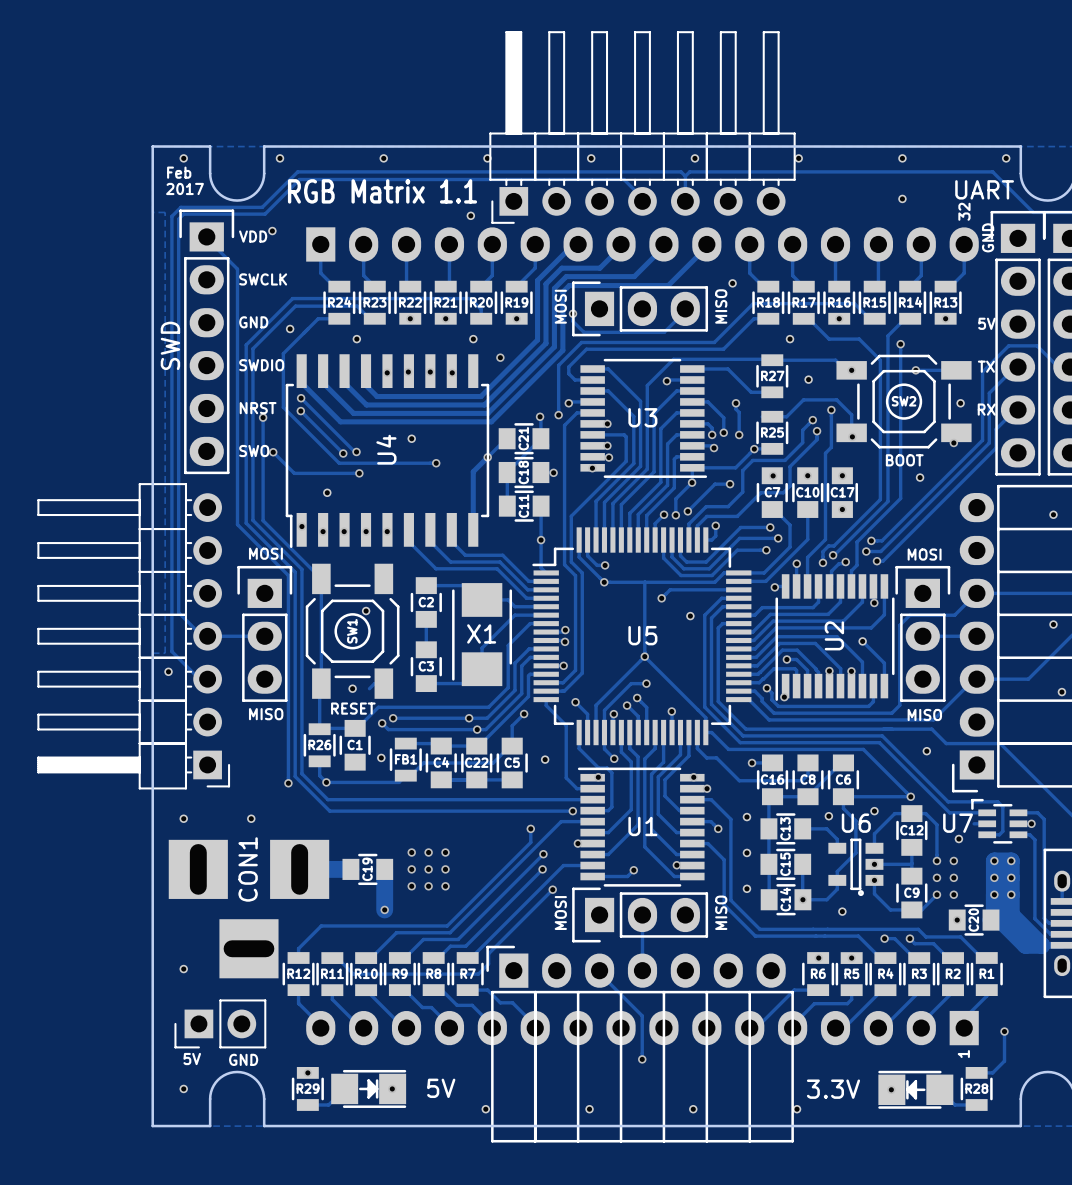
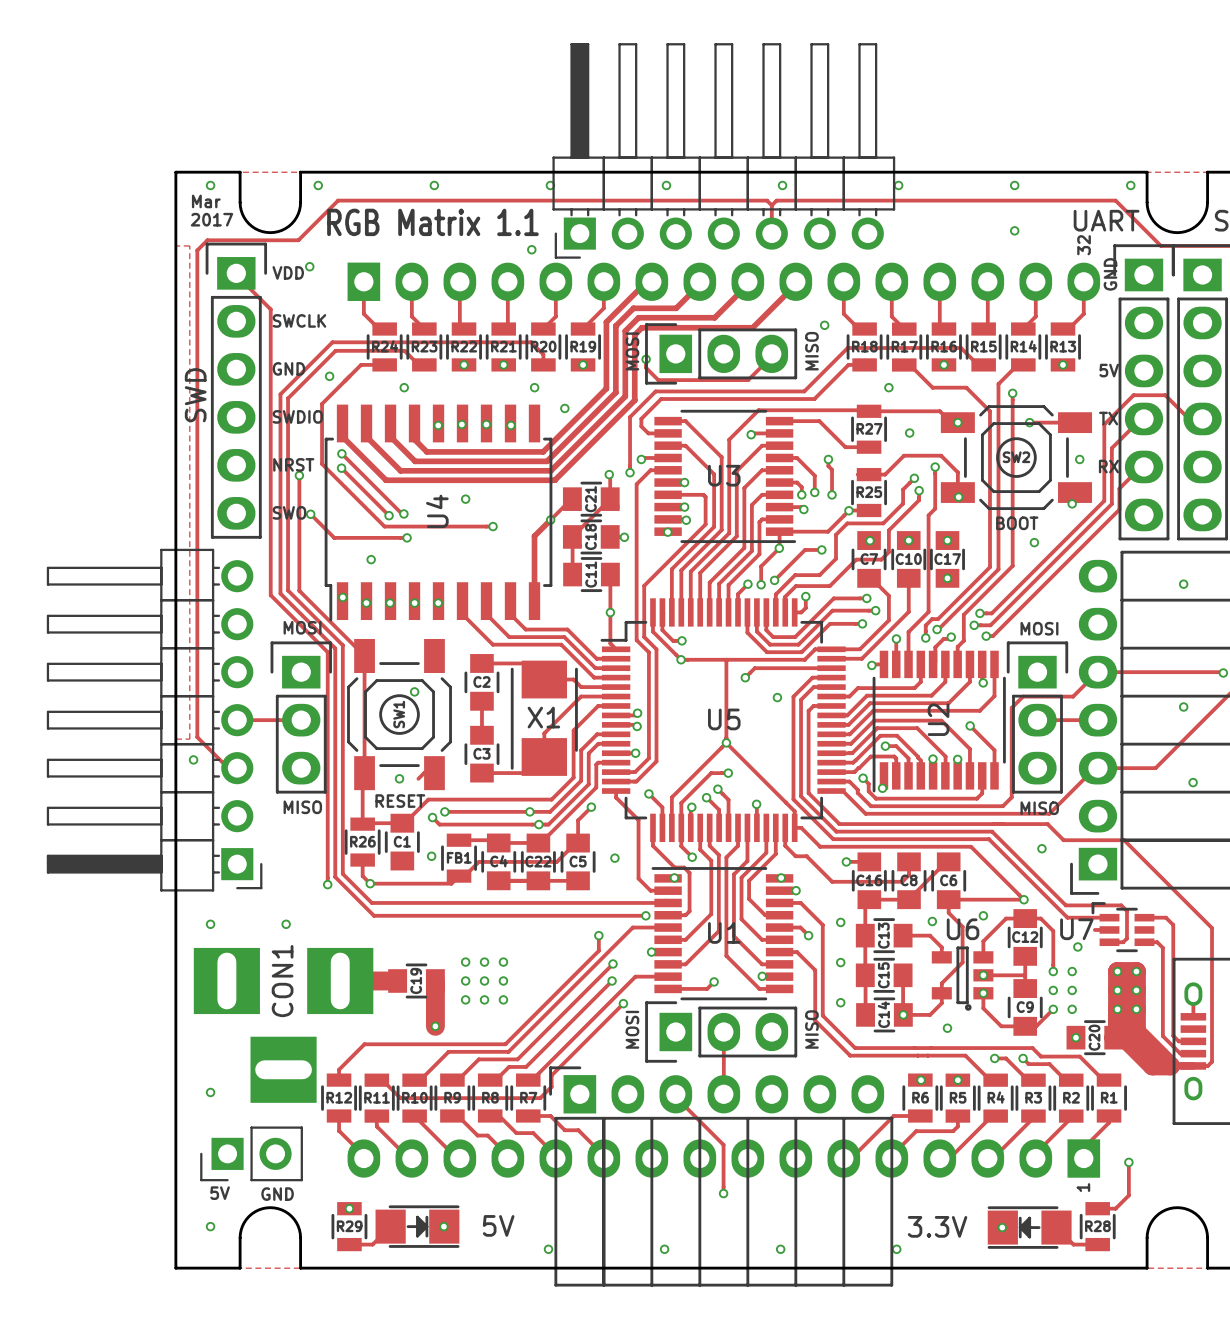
text: Feb (179, 172) -> Mar (206, 201)
track: (641, 196) (623, 179) (299, 179) (265, 214) (183, 214) (178, 219) (178, 612) (202, 636) -> none
via: (1031, 823) -> none

